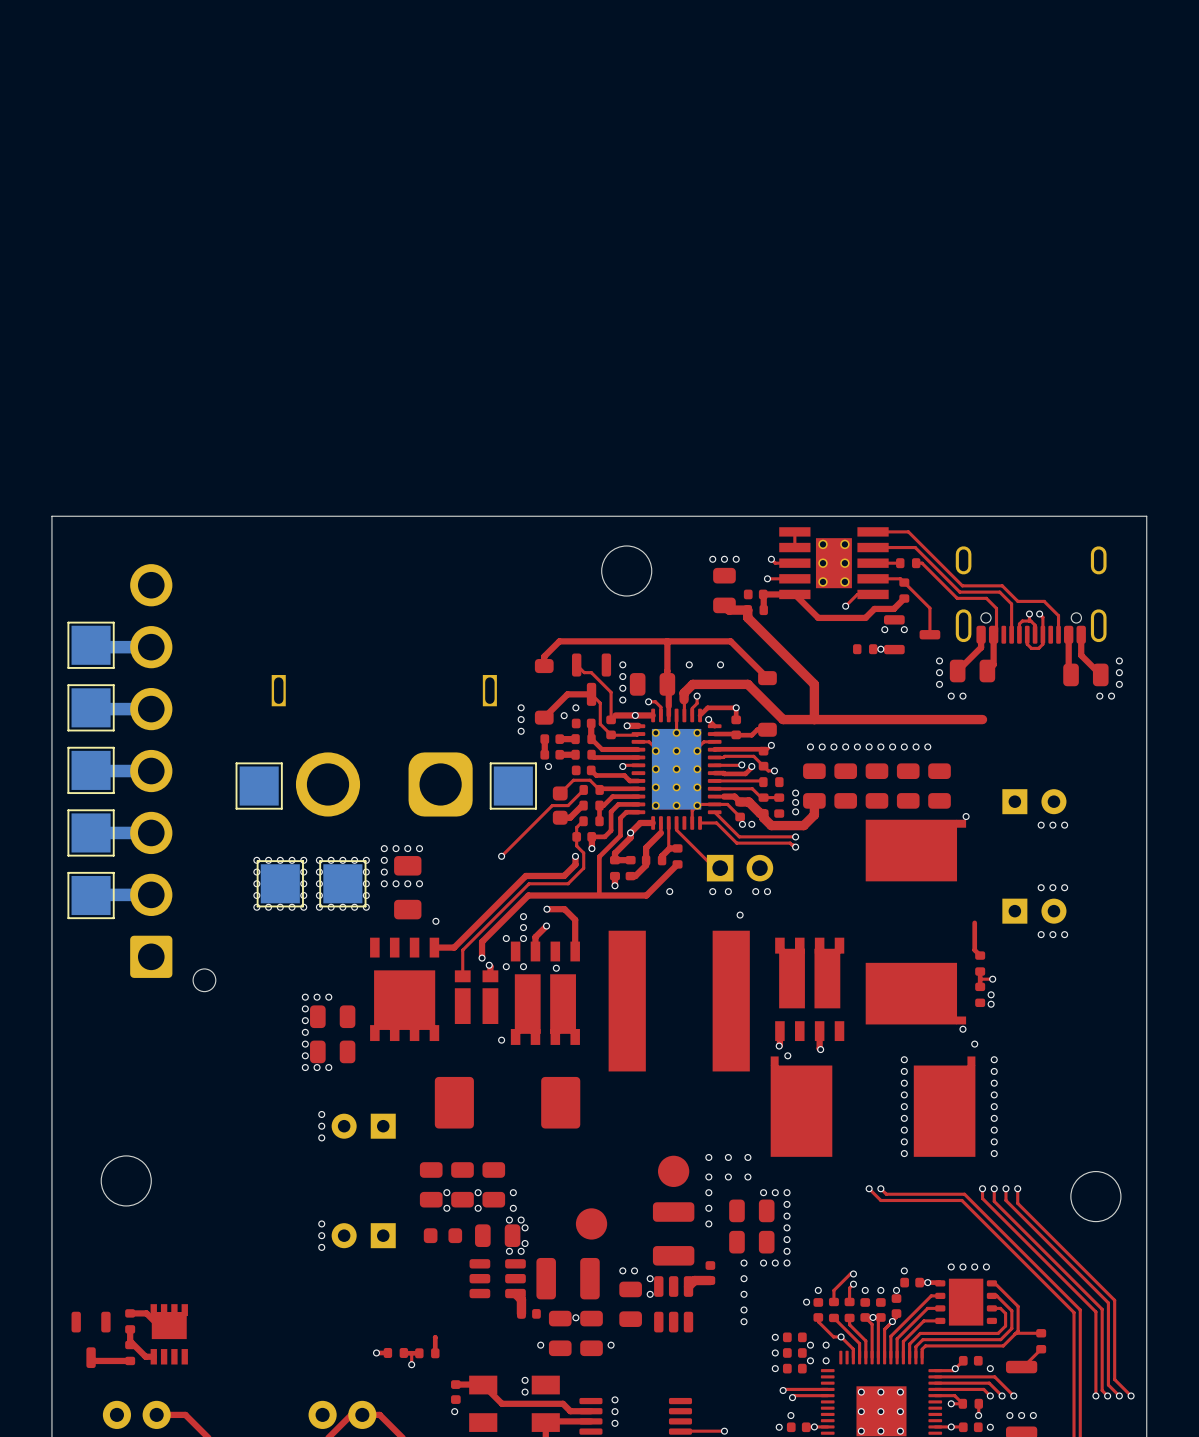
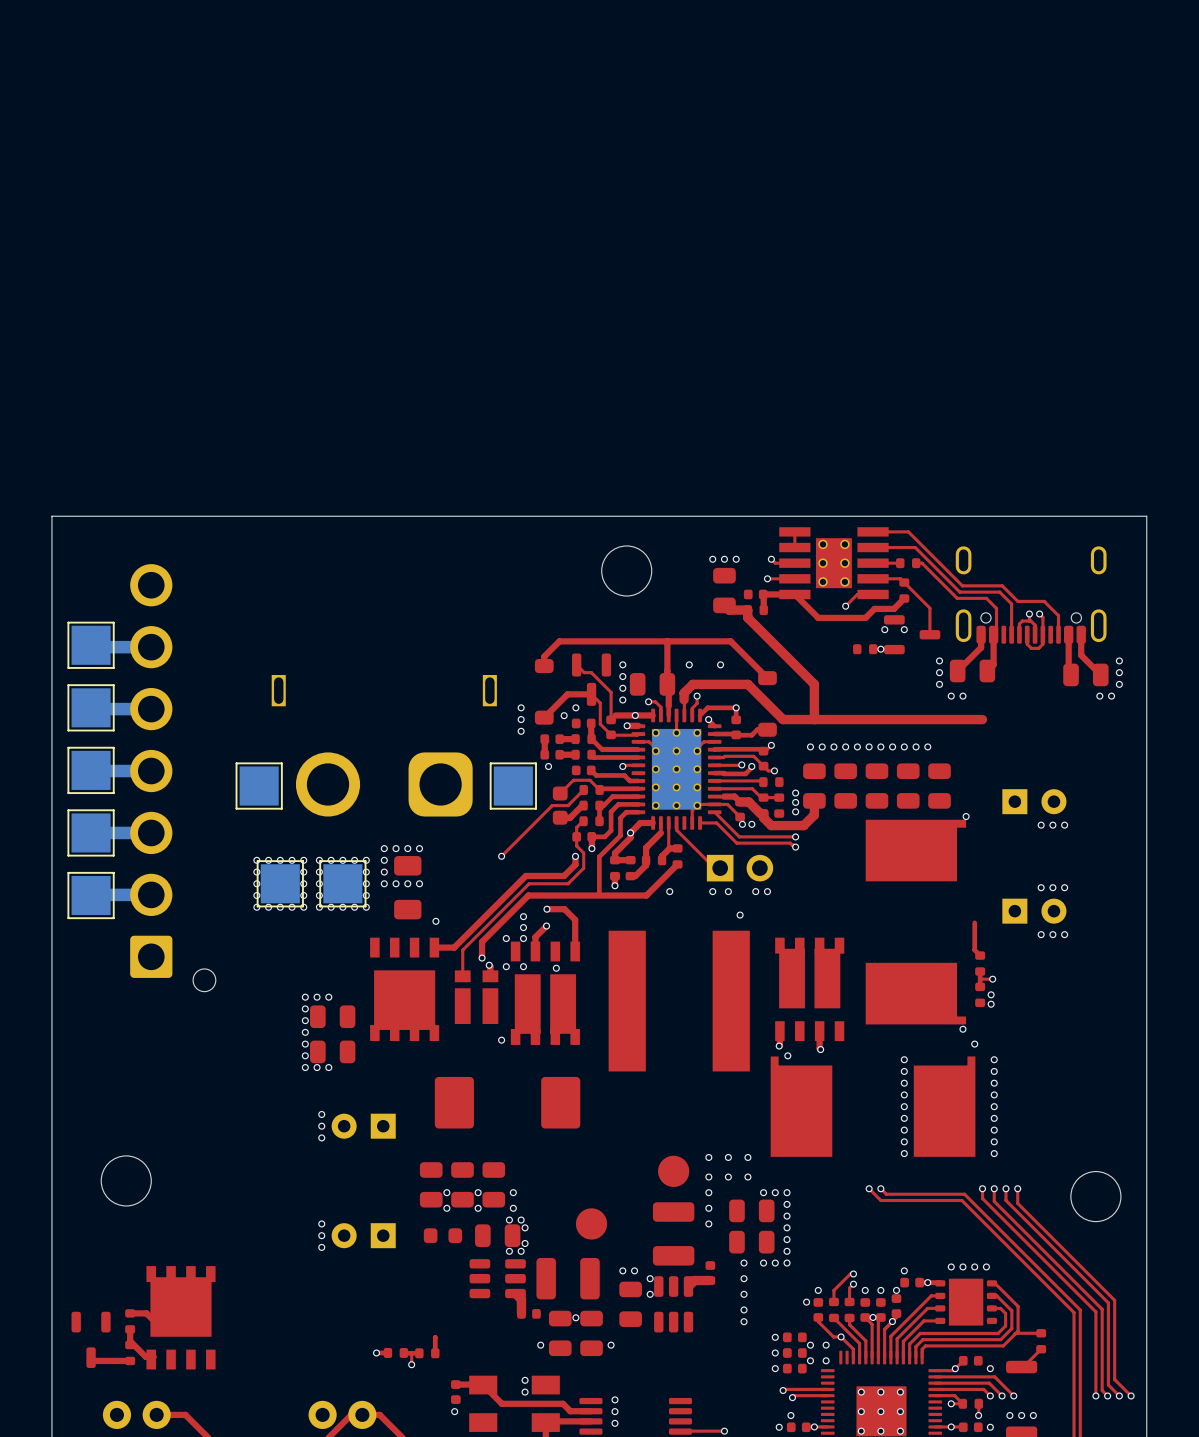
part: none -> (180, 1317)
part: (169, 1334) -> none

